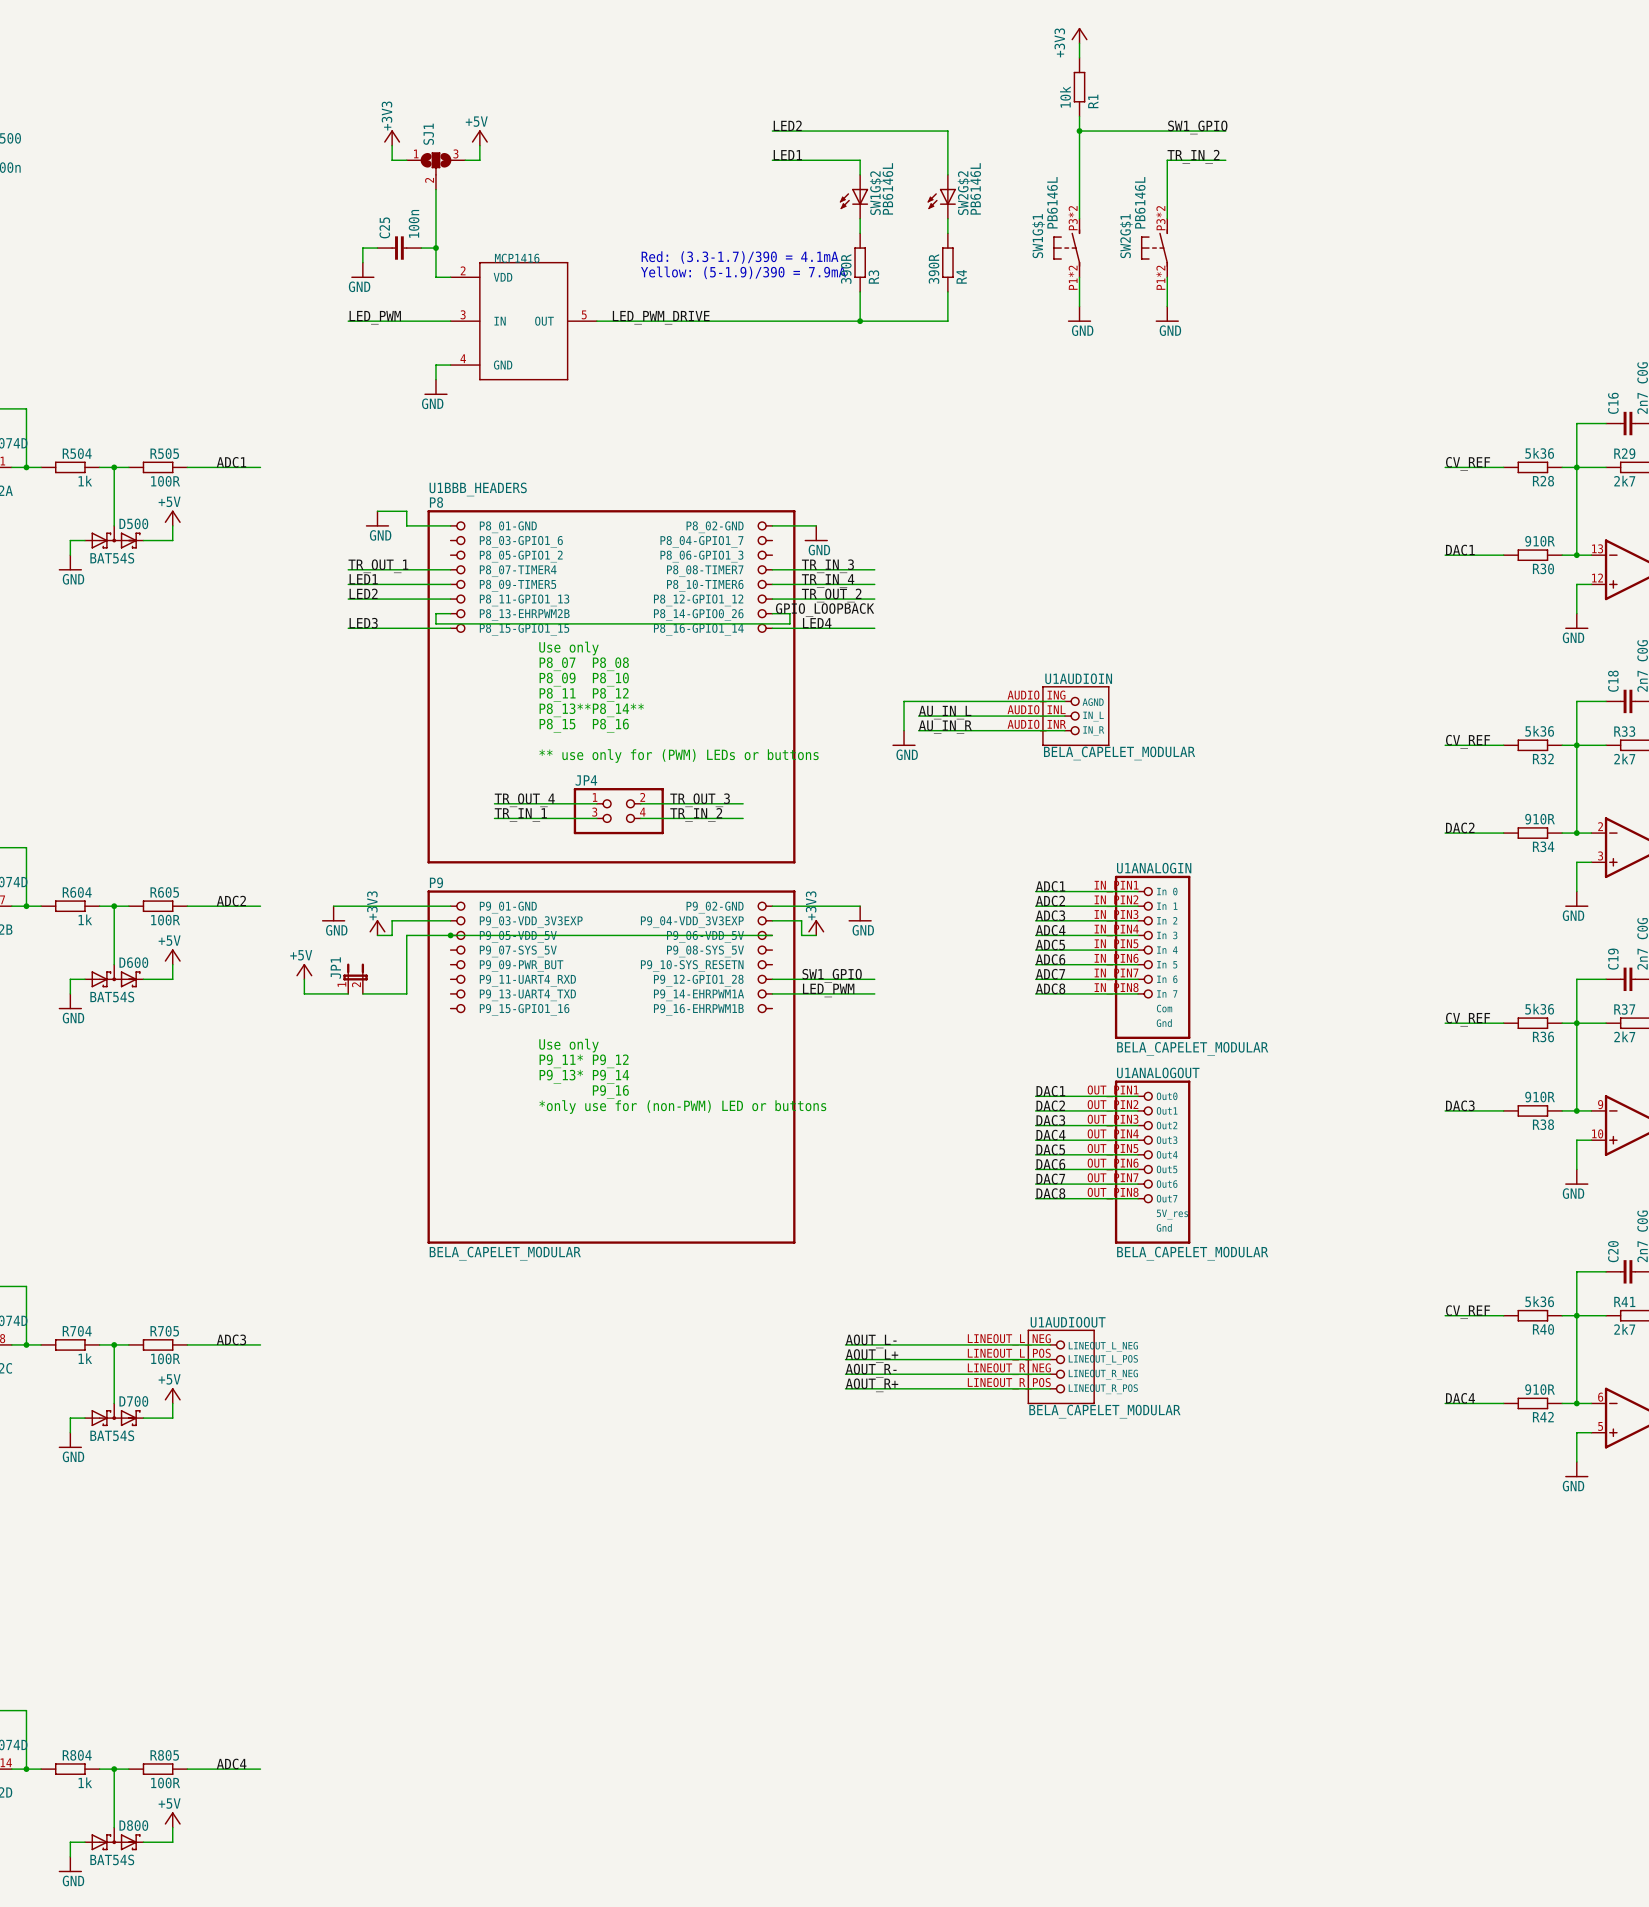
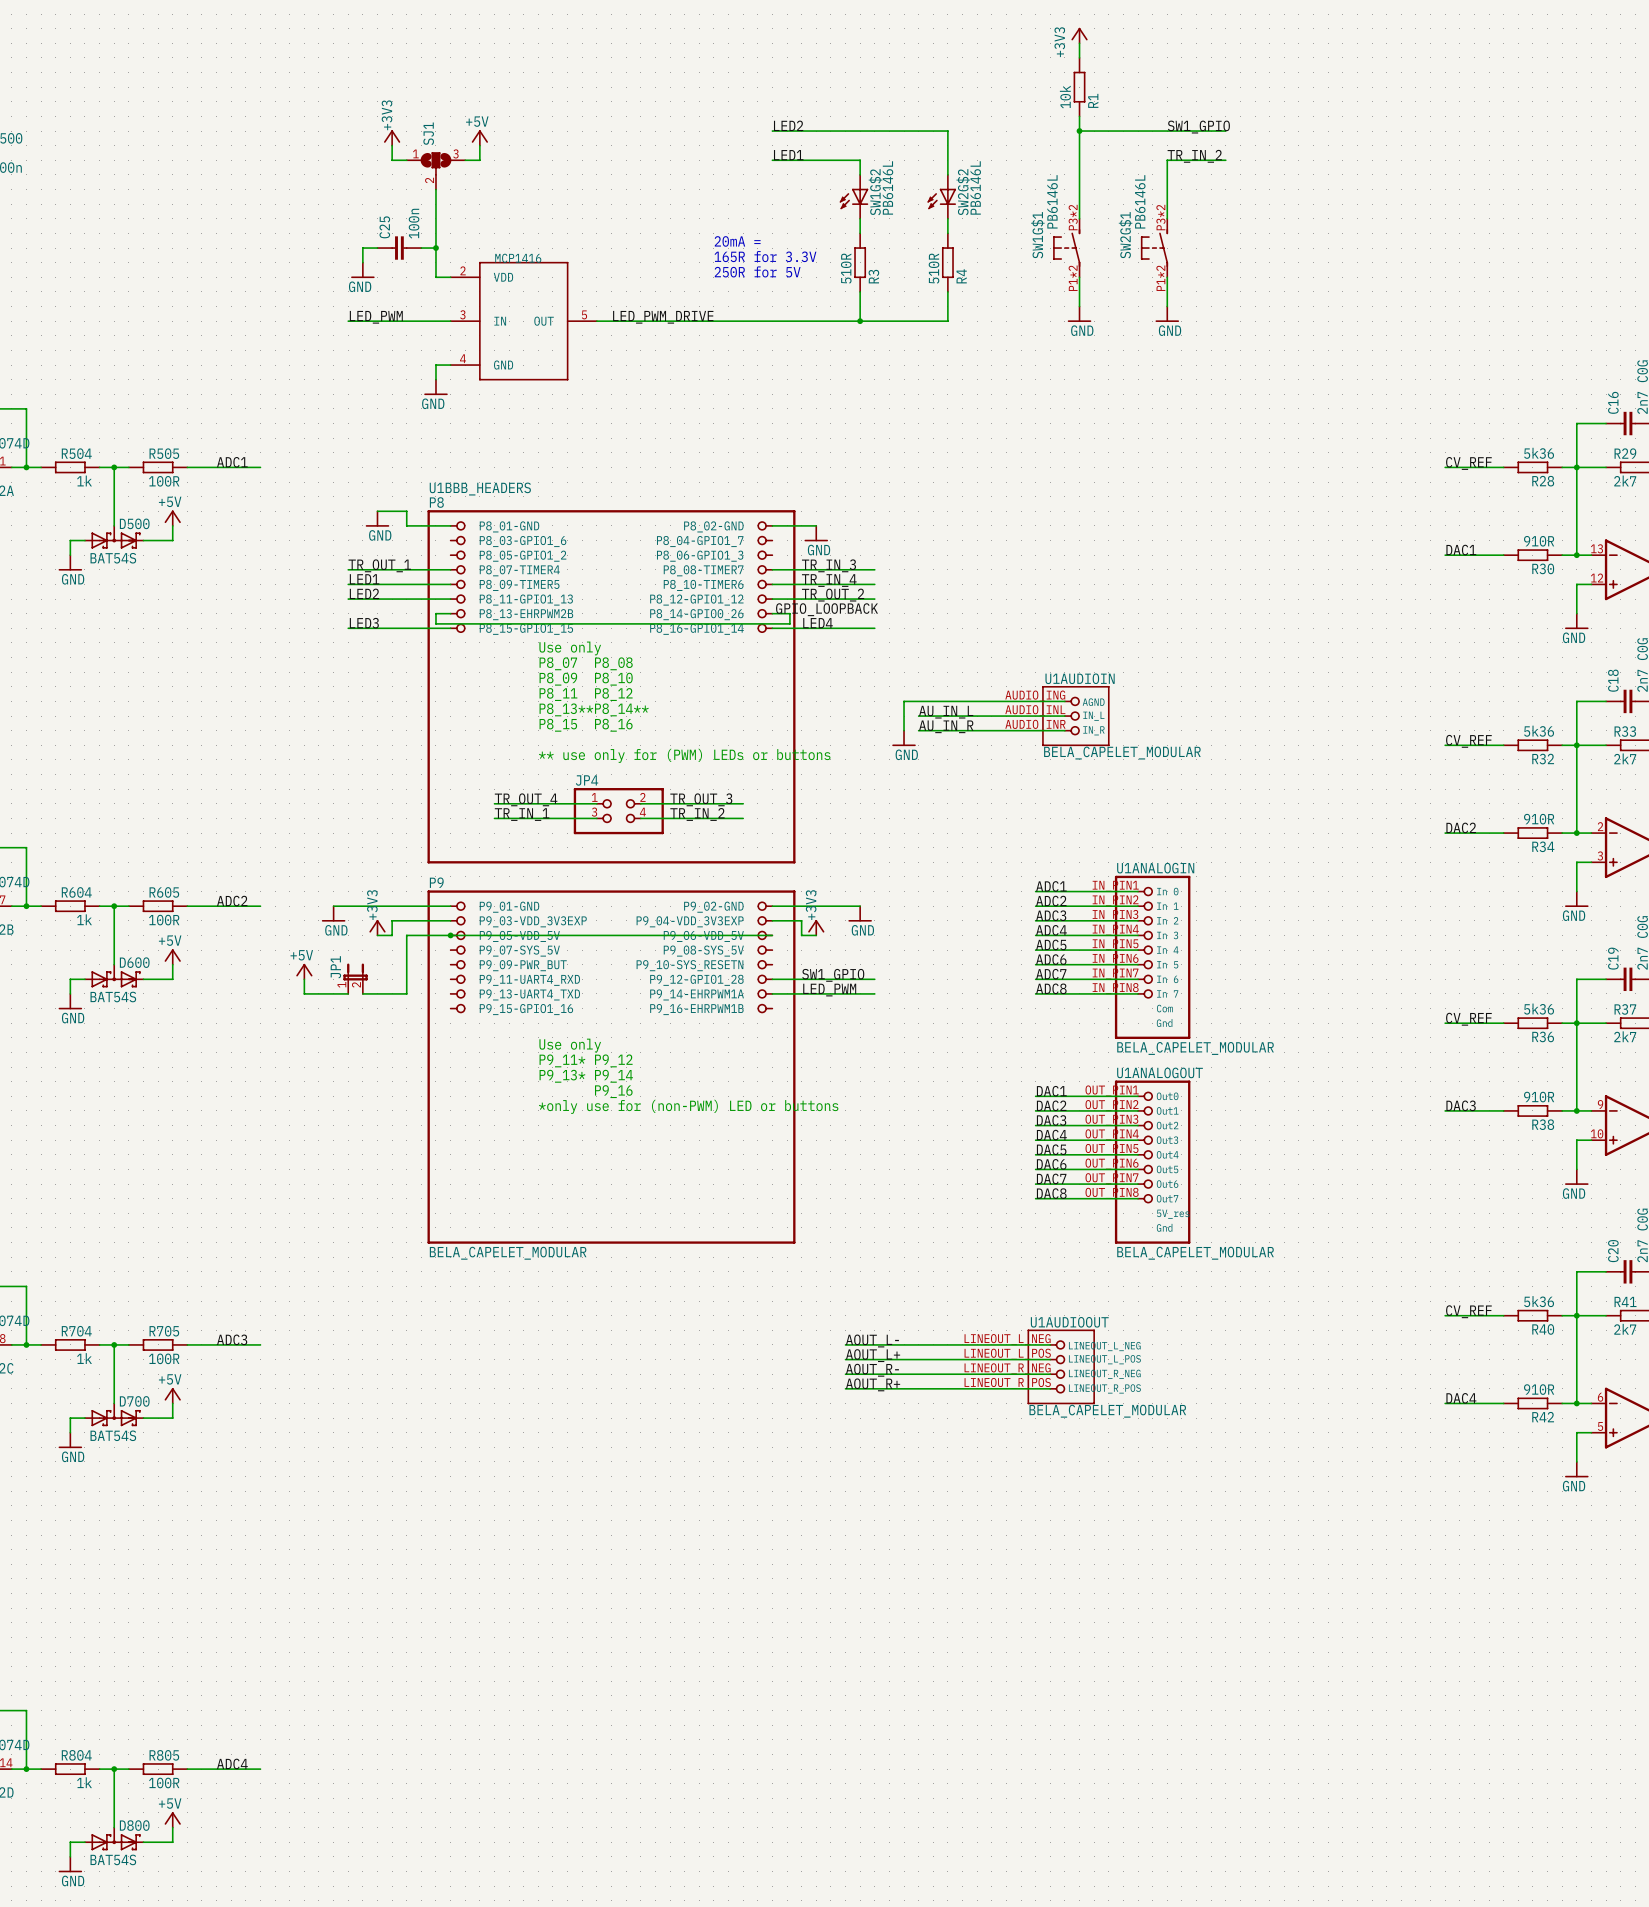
text: none -> 20mA = (737, 241)
text: none -> 165R for 3.3V (765, 256)
text: Red: (3.3-1.7)/390 = 4.1mA (739, 257) -> none
R3 value: 390R (846, 268) -> 510R (846, 268)
R4 value: 390R (934, 268) -> 510R (933, 268)
text: Yellow: (5-1.9)/390 = 7.9mA (743, 272) -> none
text: none -> 250R for 5V (757, 271)

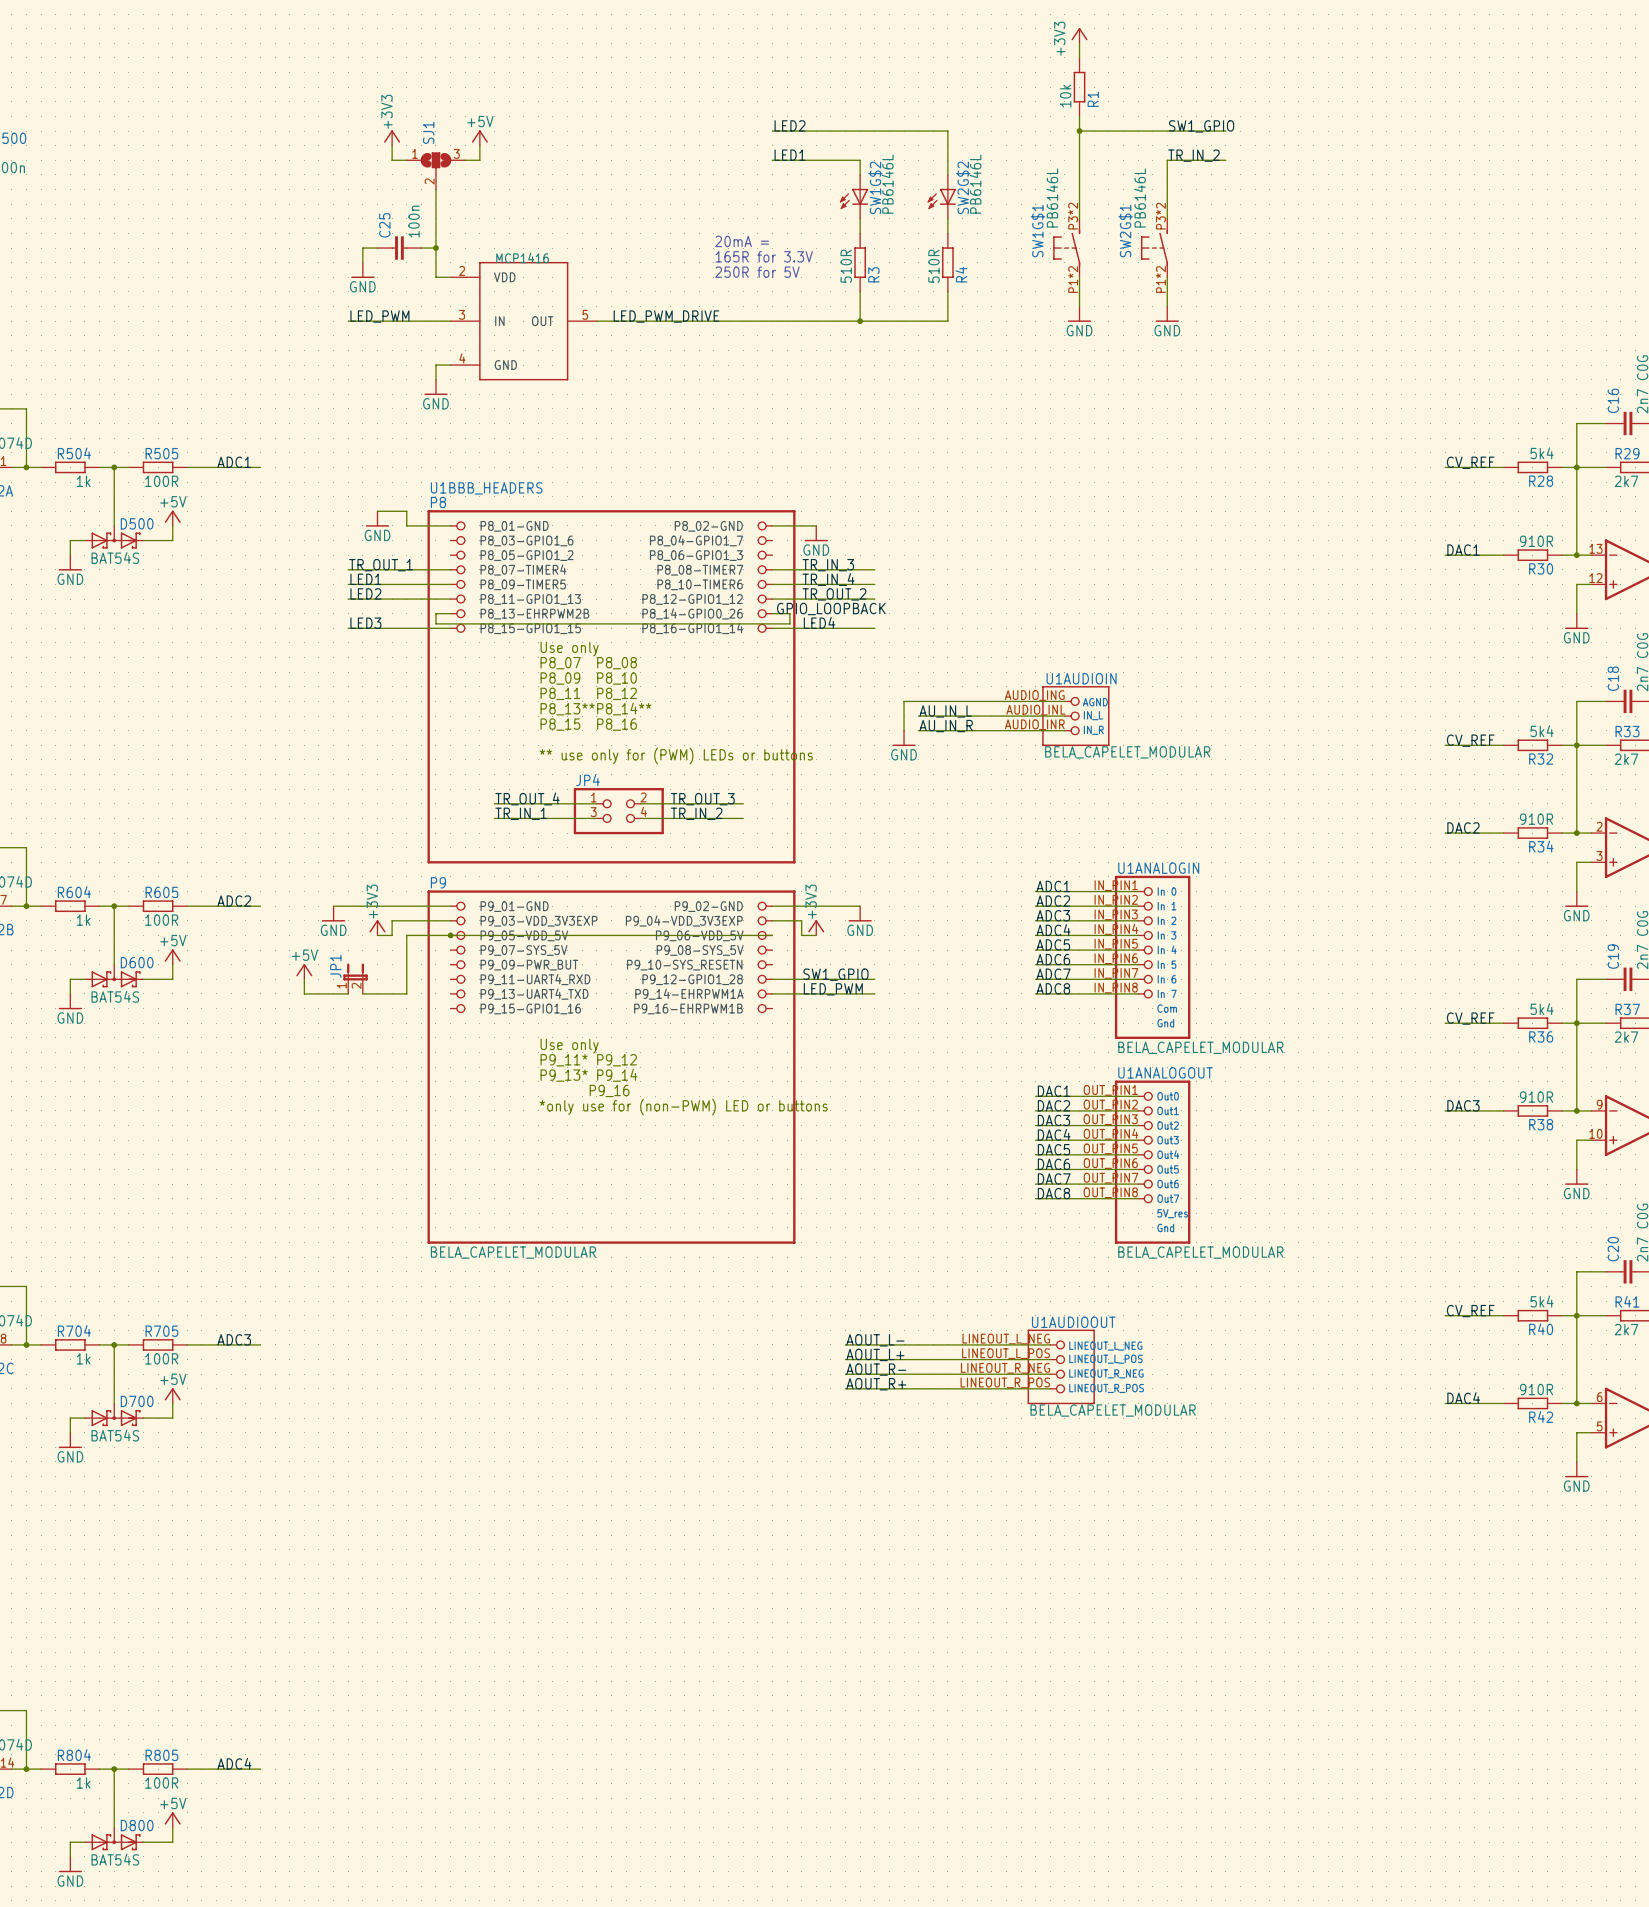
R28 value: 5k36 (1539, 453) -> 5k4 (1542, 453)
R32 value: 5k36 (1539, 731) -> 5k4 (1542, 731)
R36 value: 5k36 (1539, 1009) -> 5k4 (1542, 1009)
R40 value: 5k36 (1539, 1301) -> 5k4 (1542, 1301)

